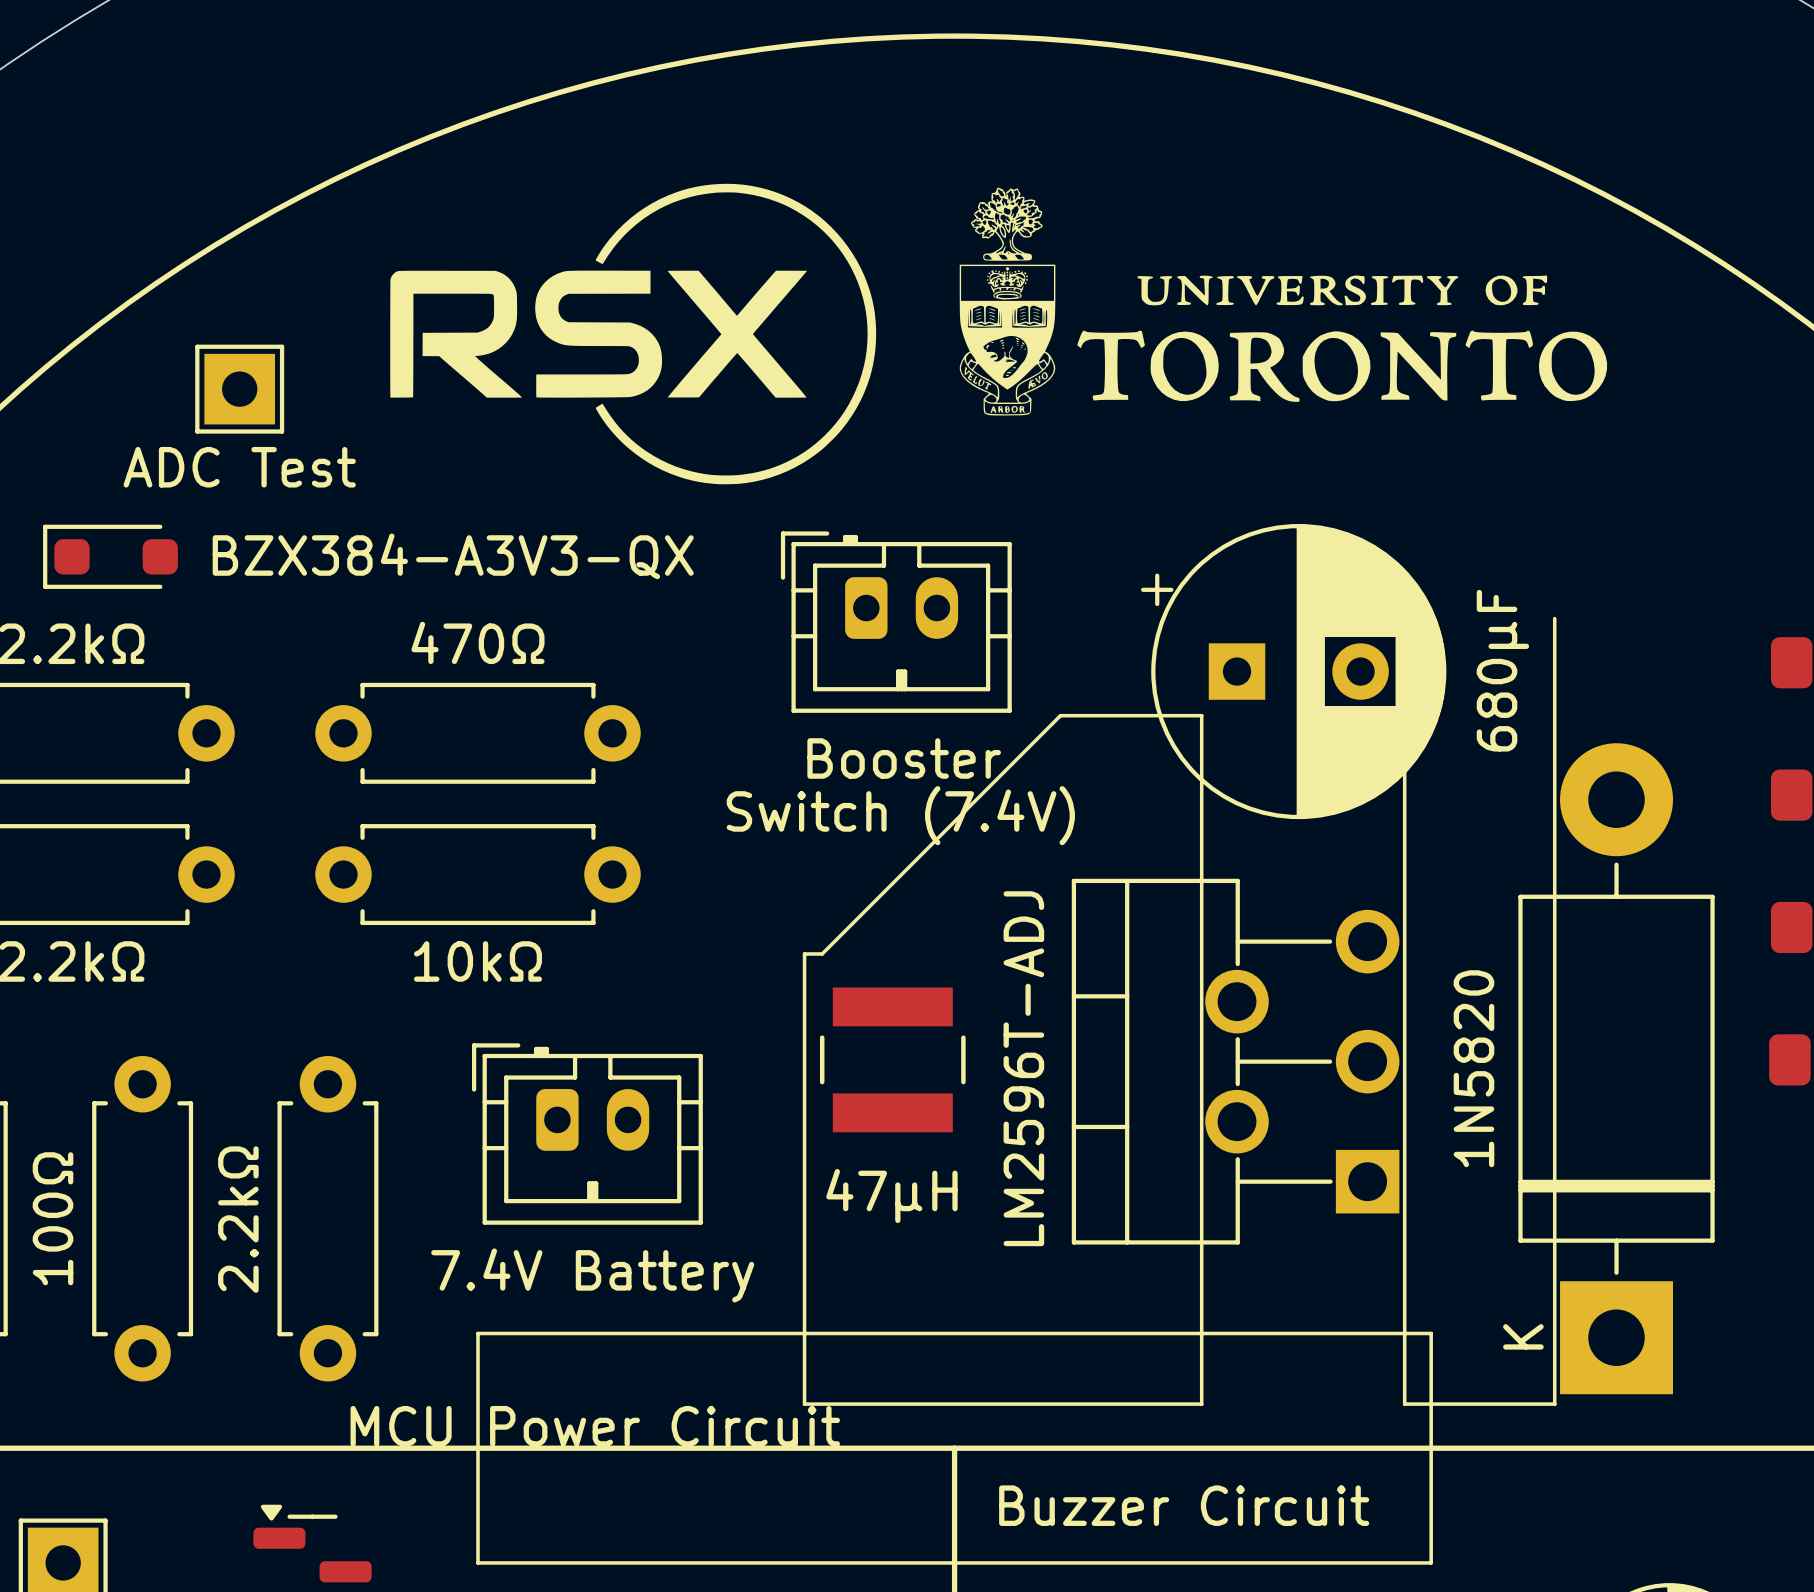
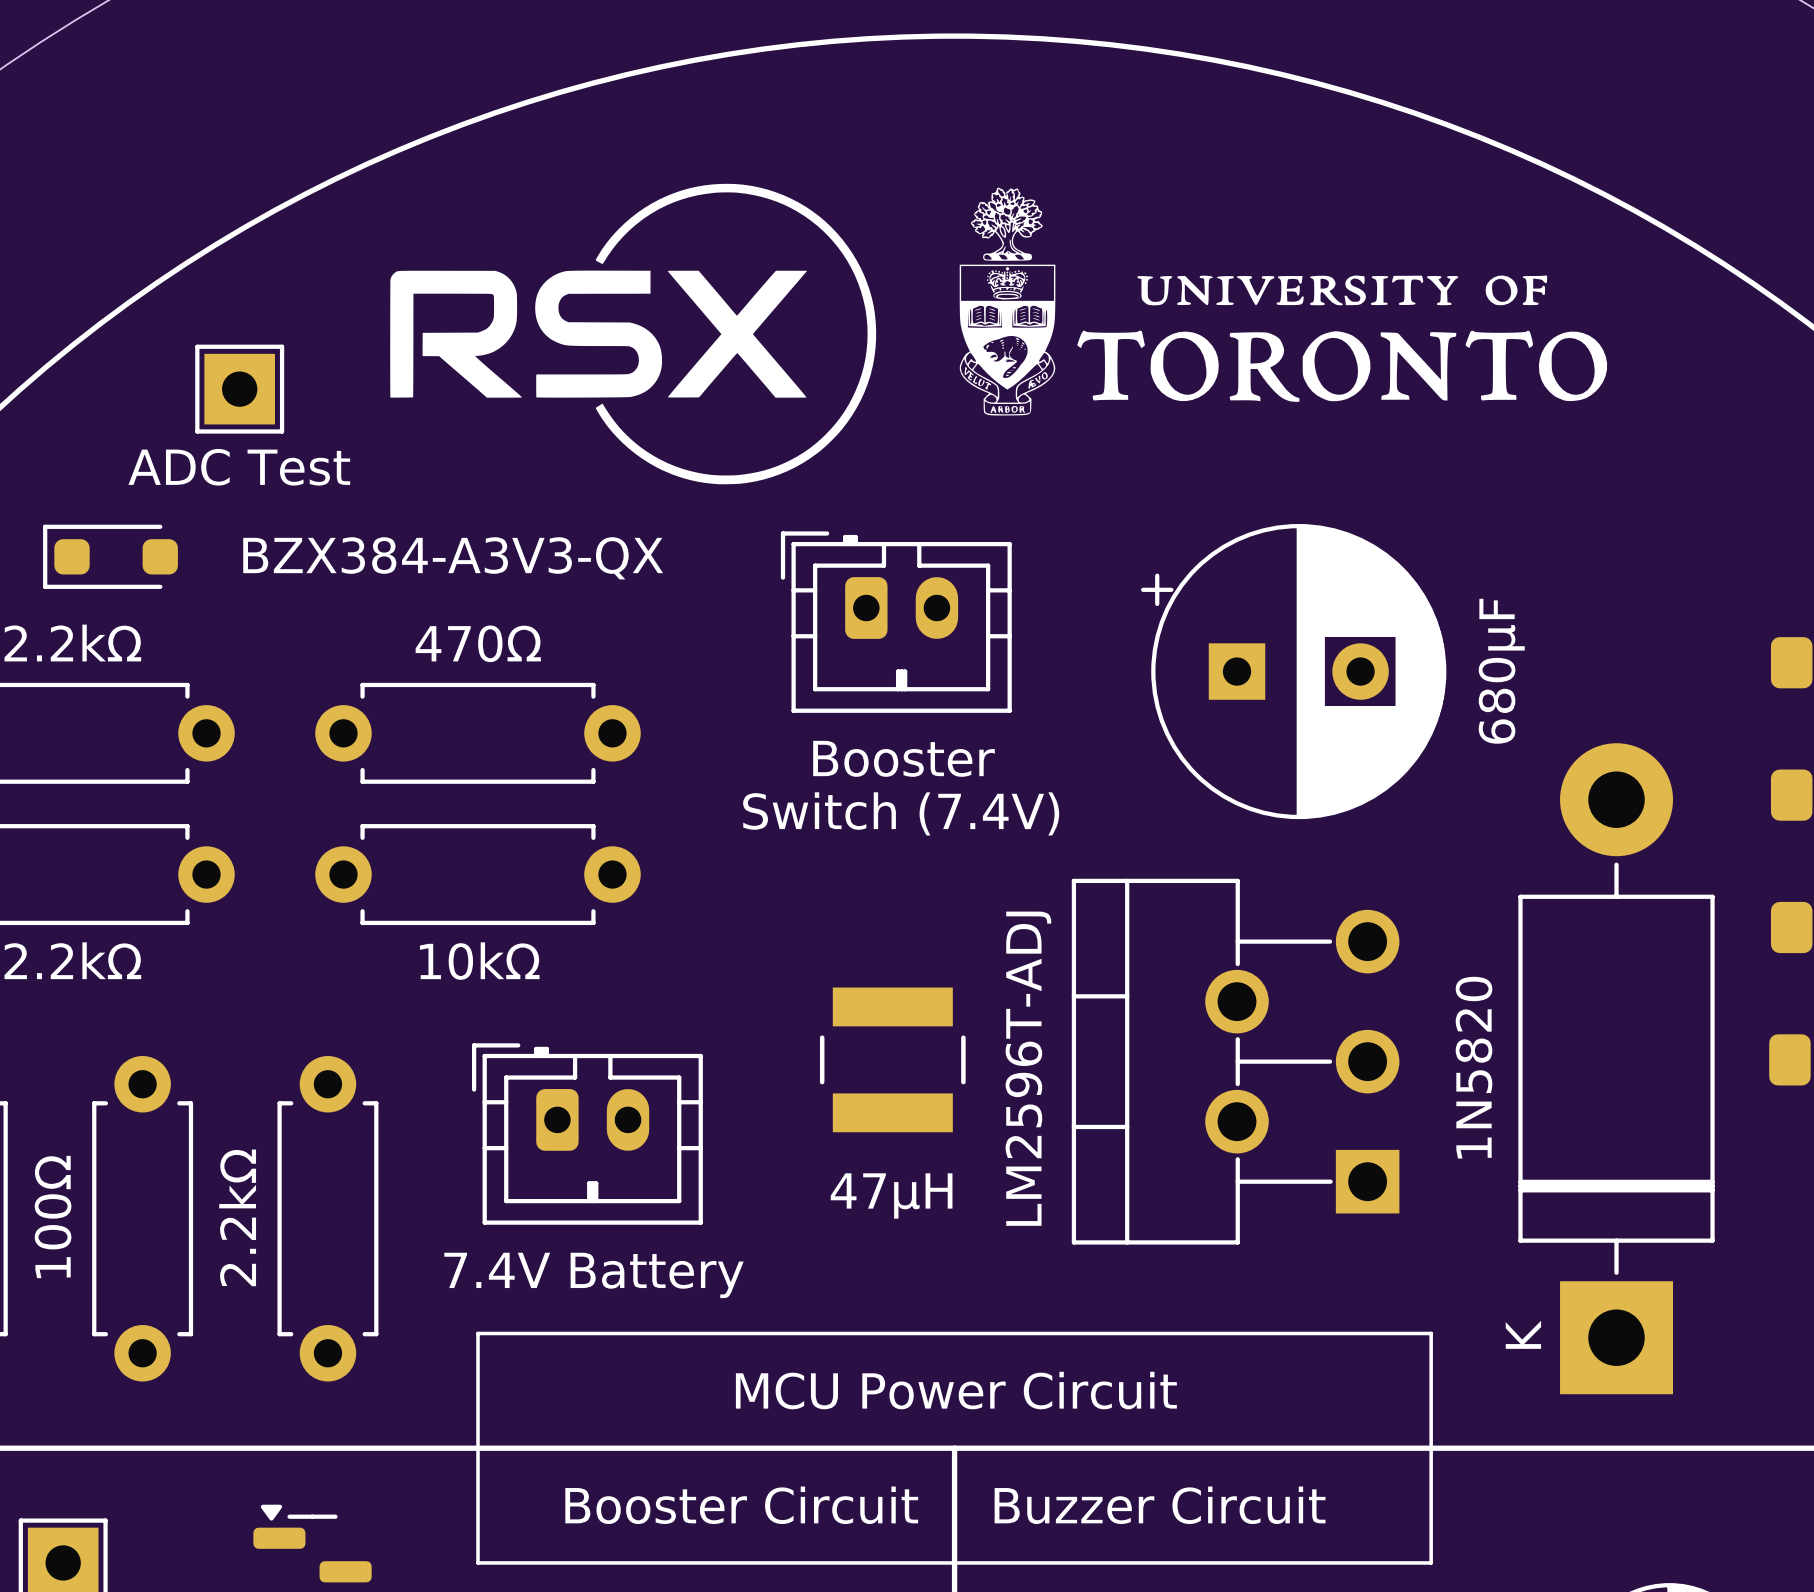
line: (1404, 618) (1404, 1404) (1554, 1404) (1554, 618) -> none
line: (1060, 715) (822, 953) (804, 953) (804, 1404) (1201, 1404) (1201, 715) (1060, 715) -> none
text position: MCU Power Circuit (595, 1426) -> MCU Power Circuit (956, 1390)
text: none -> Booster Circuit (741, 1505)

